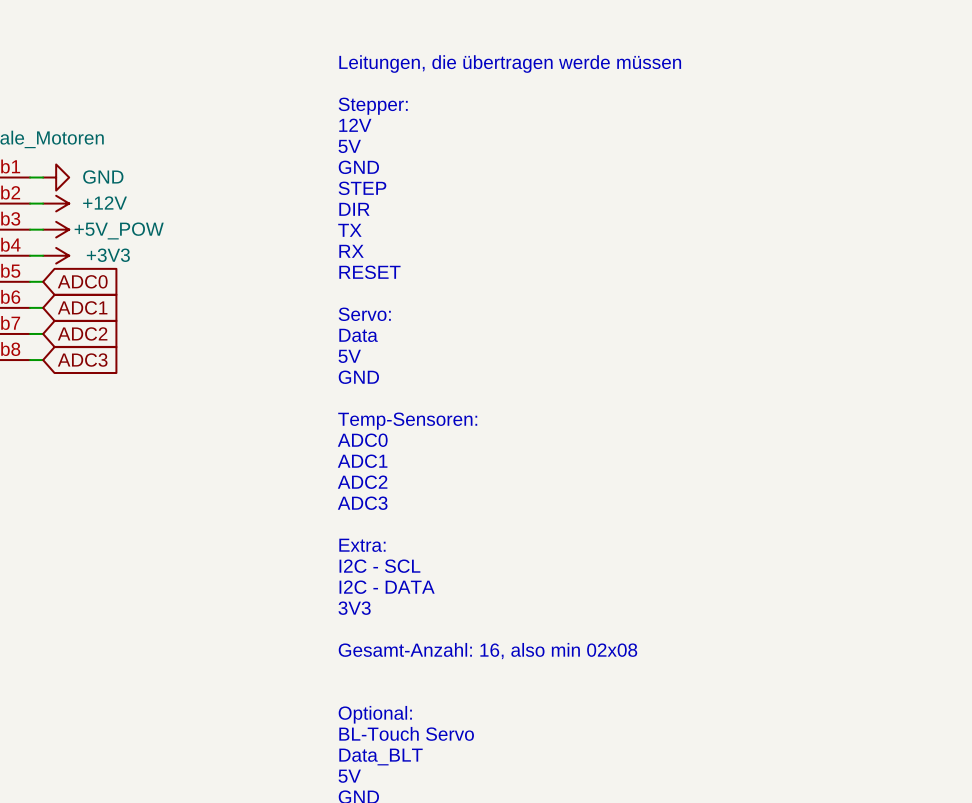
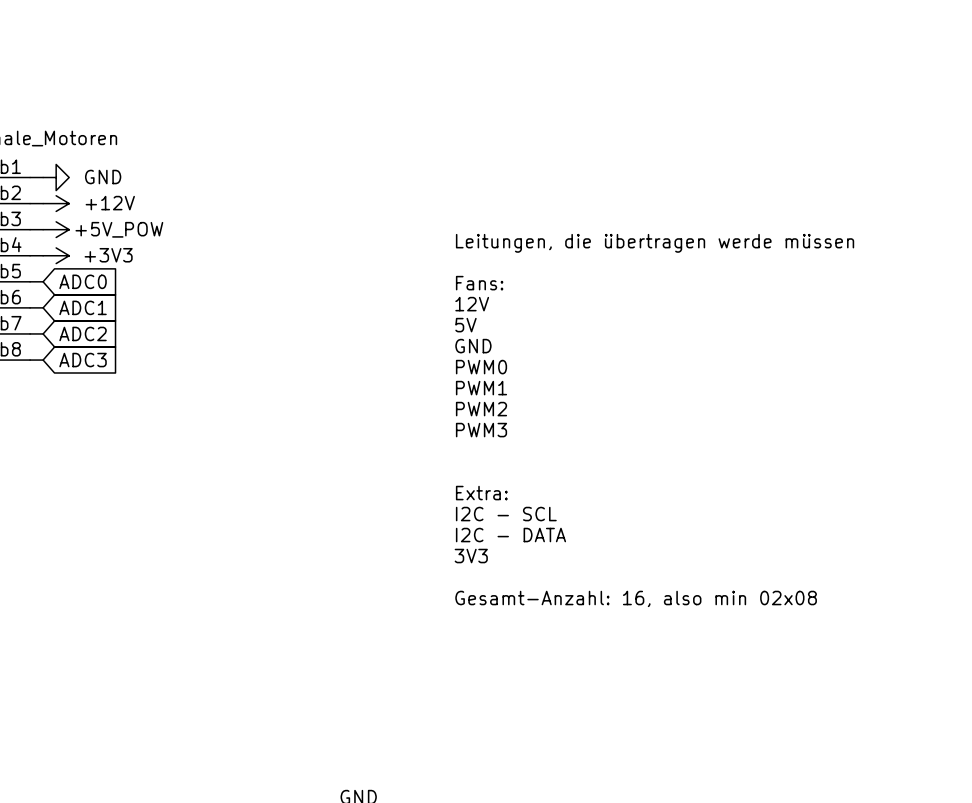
text position: Leitungen, die übertragen werde müssen (510, 64) -> Leitungen, die übertragen werde müssen (655, 243)
text: Stepper: (373, 106) -> none
text position: 12V (355, 125) -> 12V (472, 304)
text: 5V (349, 146) -> none
text: GND (358, 167) -> none
text: STEP (362, 188) -> none
text: DIR (354, 209) -> none
text: TX (349, 230) -> none
text: RX (351, 251) -> none
text: RESET (369, 272) -> none
text: none -> Fans: (479, 283)
text: Servo: (364, 314) -> none
text: none -> 5V (465, 325)
text: Data (358, 335) -> none
text: none -> GND (473, 346)
text: 5V (349, 356) -> none
text: none -> PWM0 (481, 367)
text: GND (358, 377) -> none
text: none -> PWM1 (481, 388)
text: none -> PWM2 (481, 409)
text: Temp-Sensoren: (407, 421) -> none
text: none -> PWM3 (481, 430)
text: ADC0 (362, 440) -> none
text: ADC1 (362, 461) -> none
text: ADC2 (362, 482) -> none
text: ADC3 (362, 503) -> none
text position: Extra: (362, 545) -> Extra: (481, 493)
text position: I2C - SCL (379, 566) -> I2C - SCL (506, 514)
text position: I2C - DATA (387, 587) -> I2C - DATA (510, 535)
text position: 3V3 (354, 608) -> 3V3 (471, 556)
text position: Gesamt-Anzahl: 16, also min 02x08 (487, 651) -> Gesamt-Anzahl: 16, also min 02x08 (636, 598)
text: Optional: (375, 714) -> none
text: BL-Touch Servo (406, 733) -> none
text: Data_BLT (381, 757) -> none
text: 5V (349, 776) -> none

